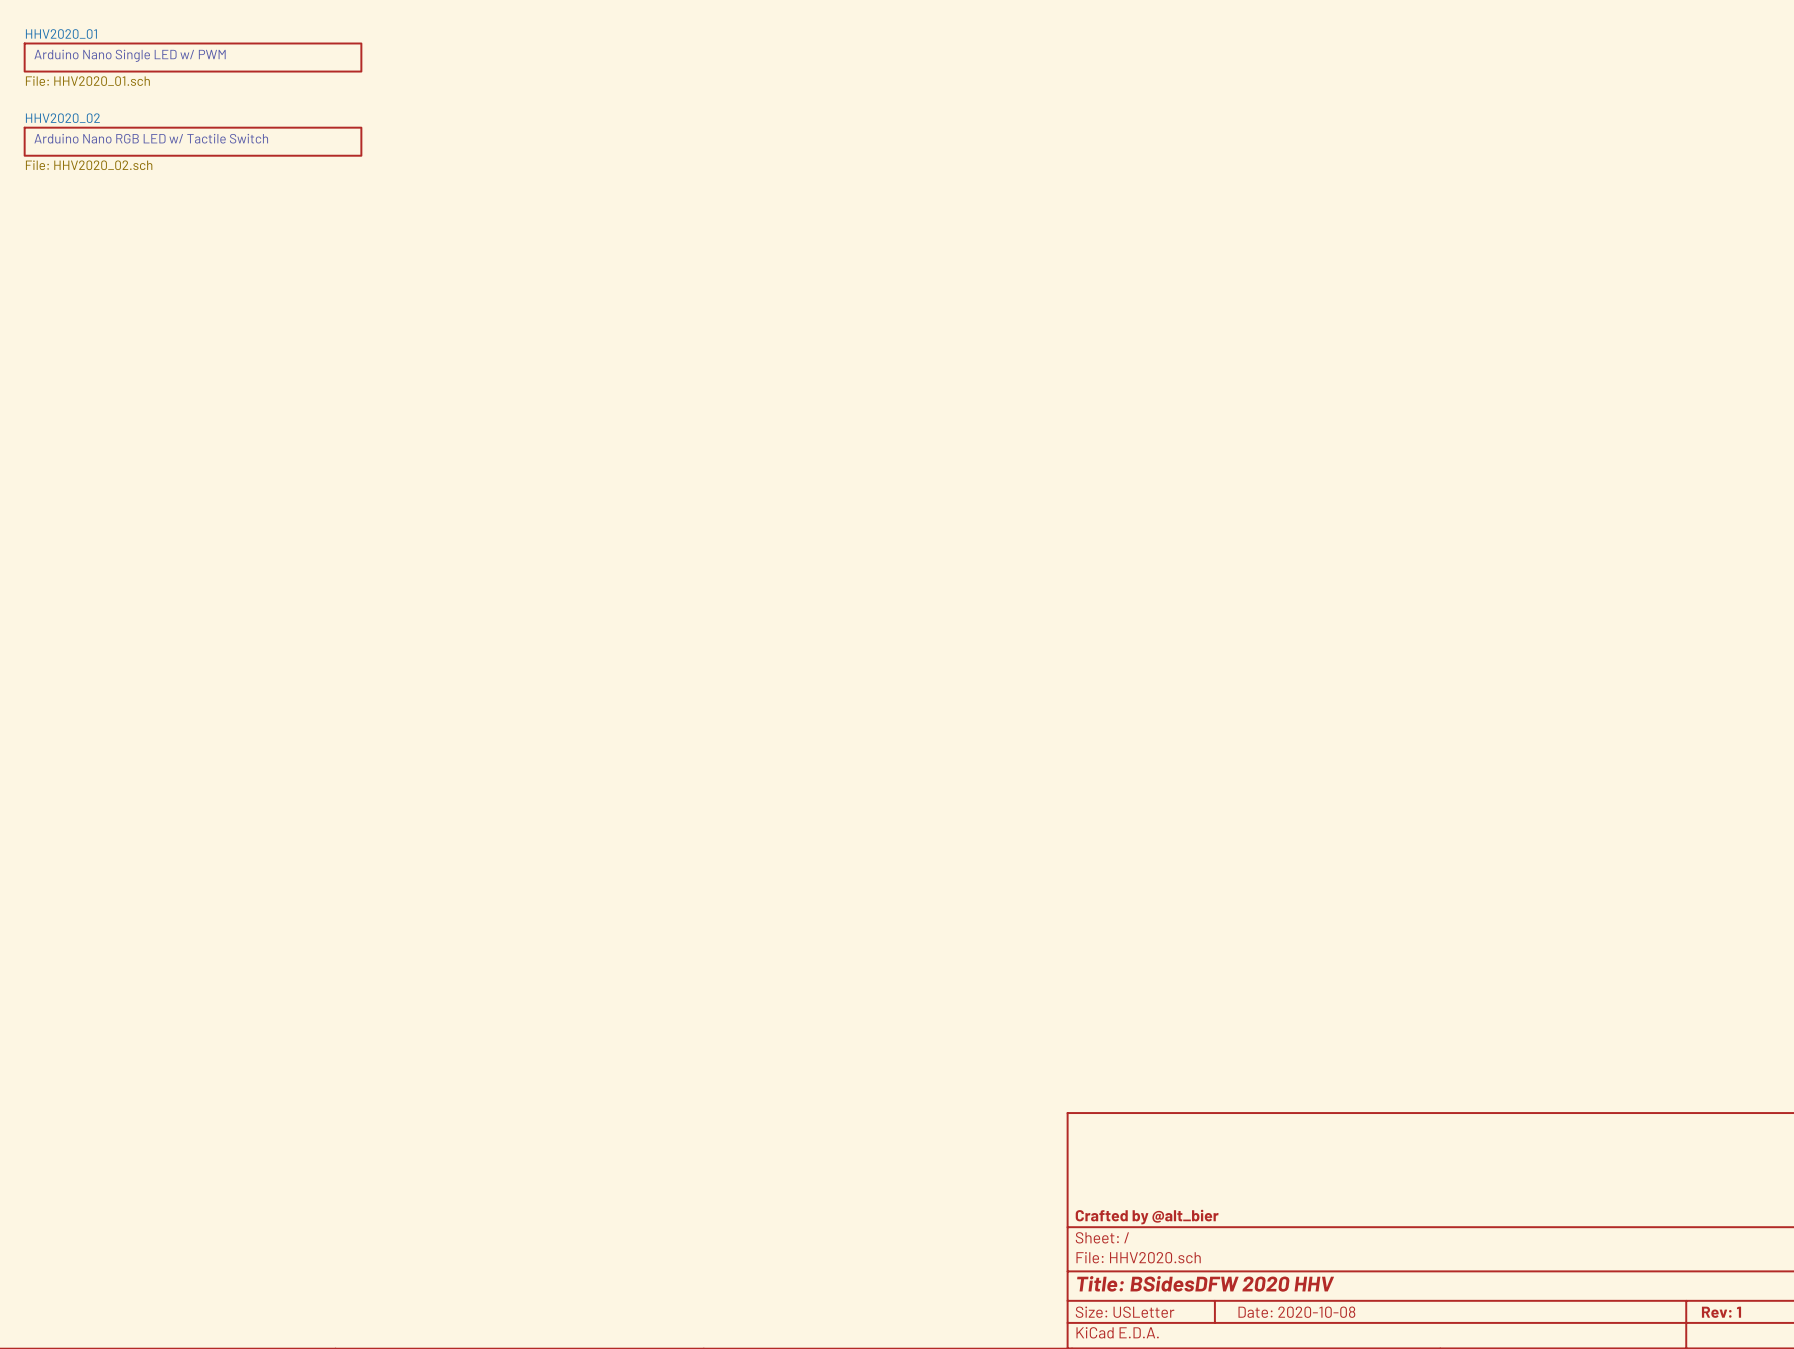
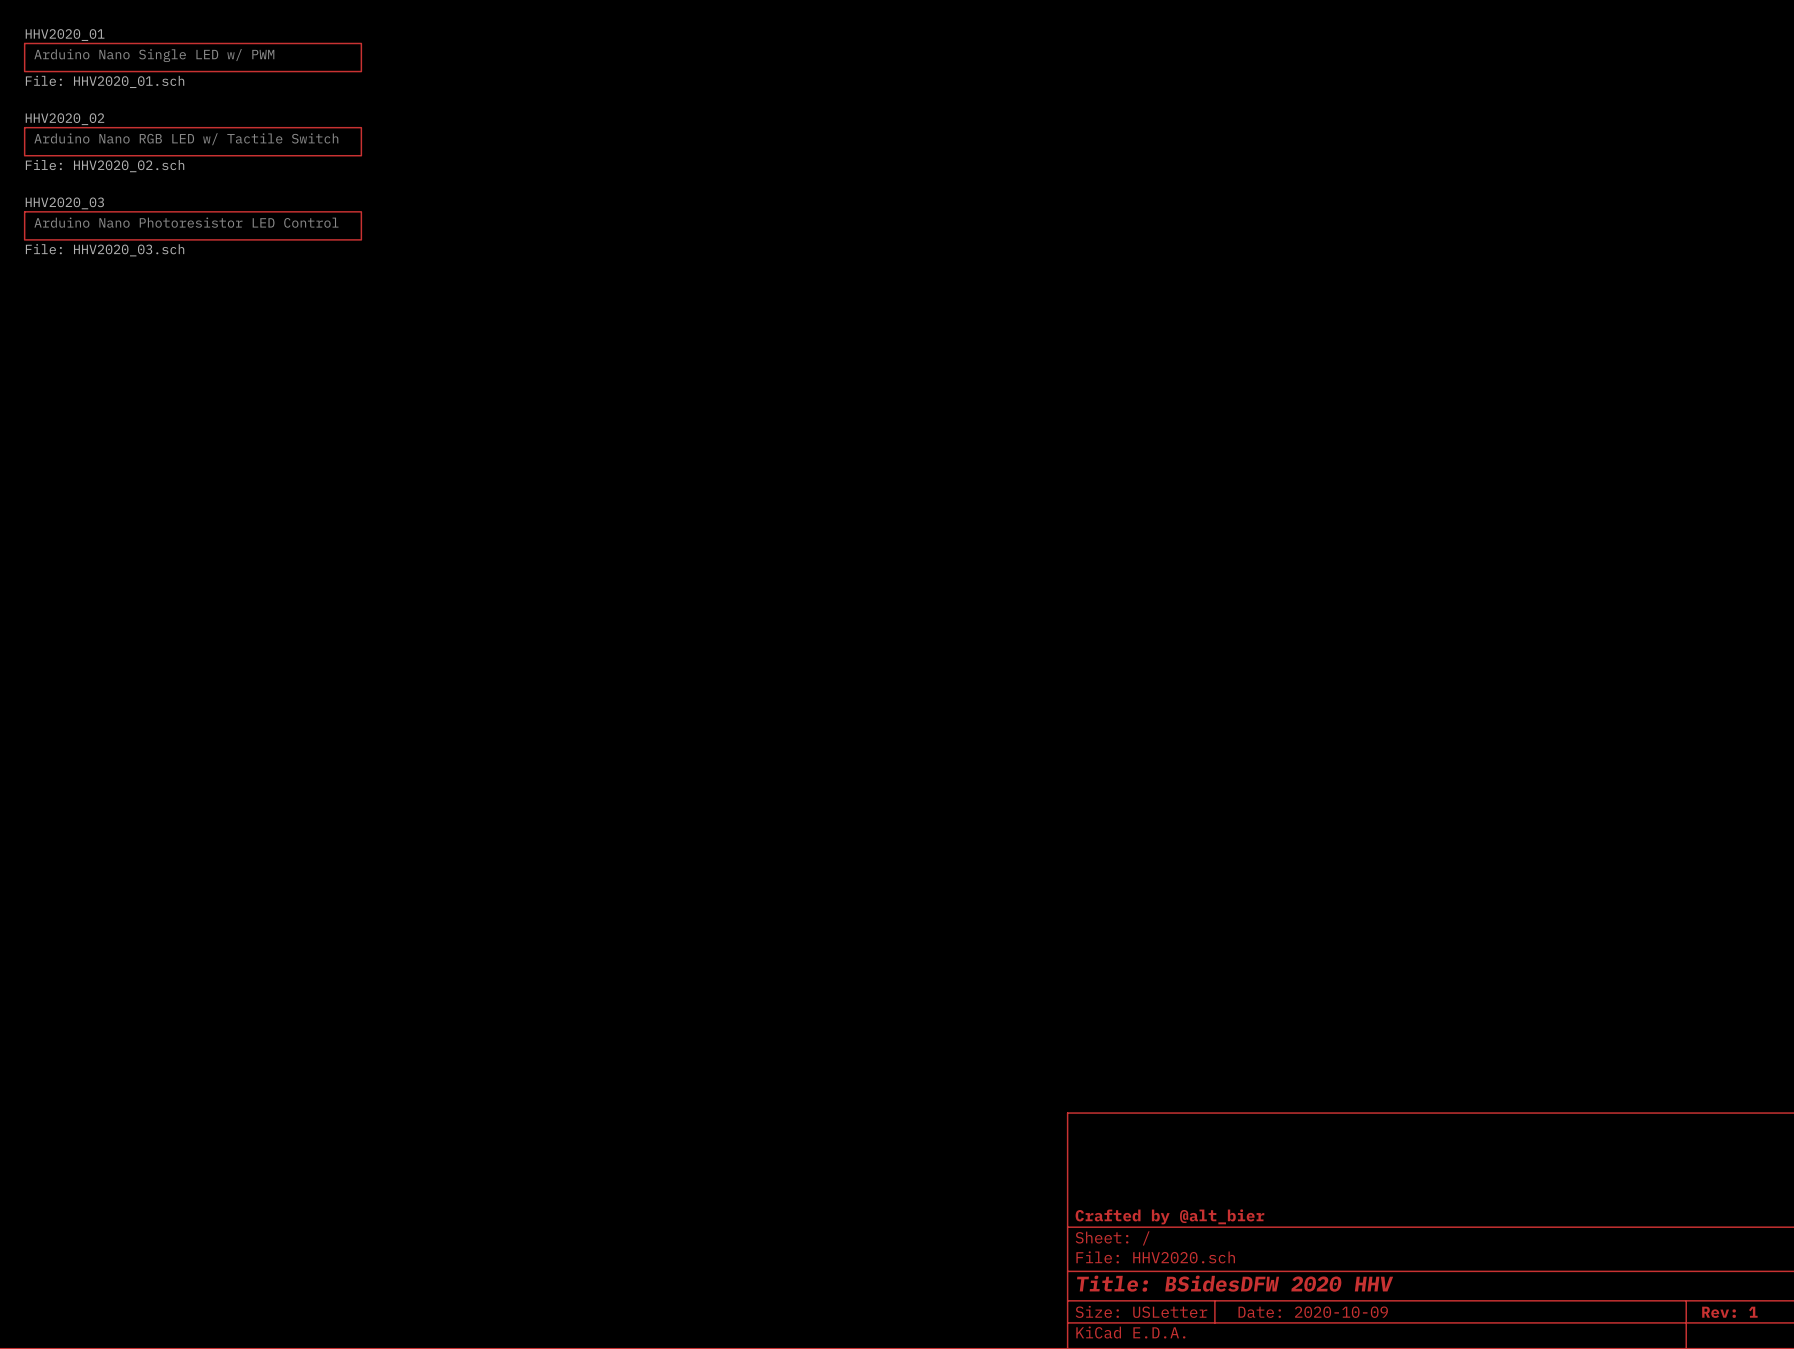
text: none -> Arduino Nano Photoresistor LED Control (186, 222)
sheet HHV2020_03: none -> File: HHV2020_03.sch (193, 225)
title block: Date: 2020-10-08 (1296, 1312) -> Date: 2020-10-09 (1313, 1312)

